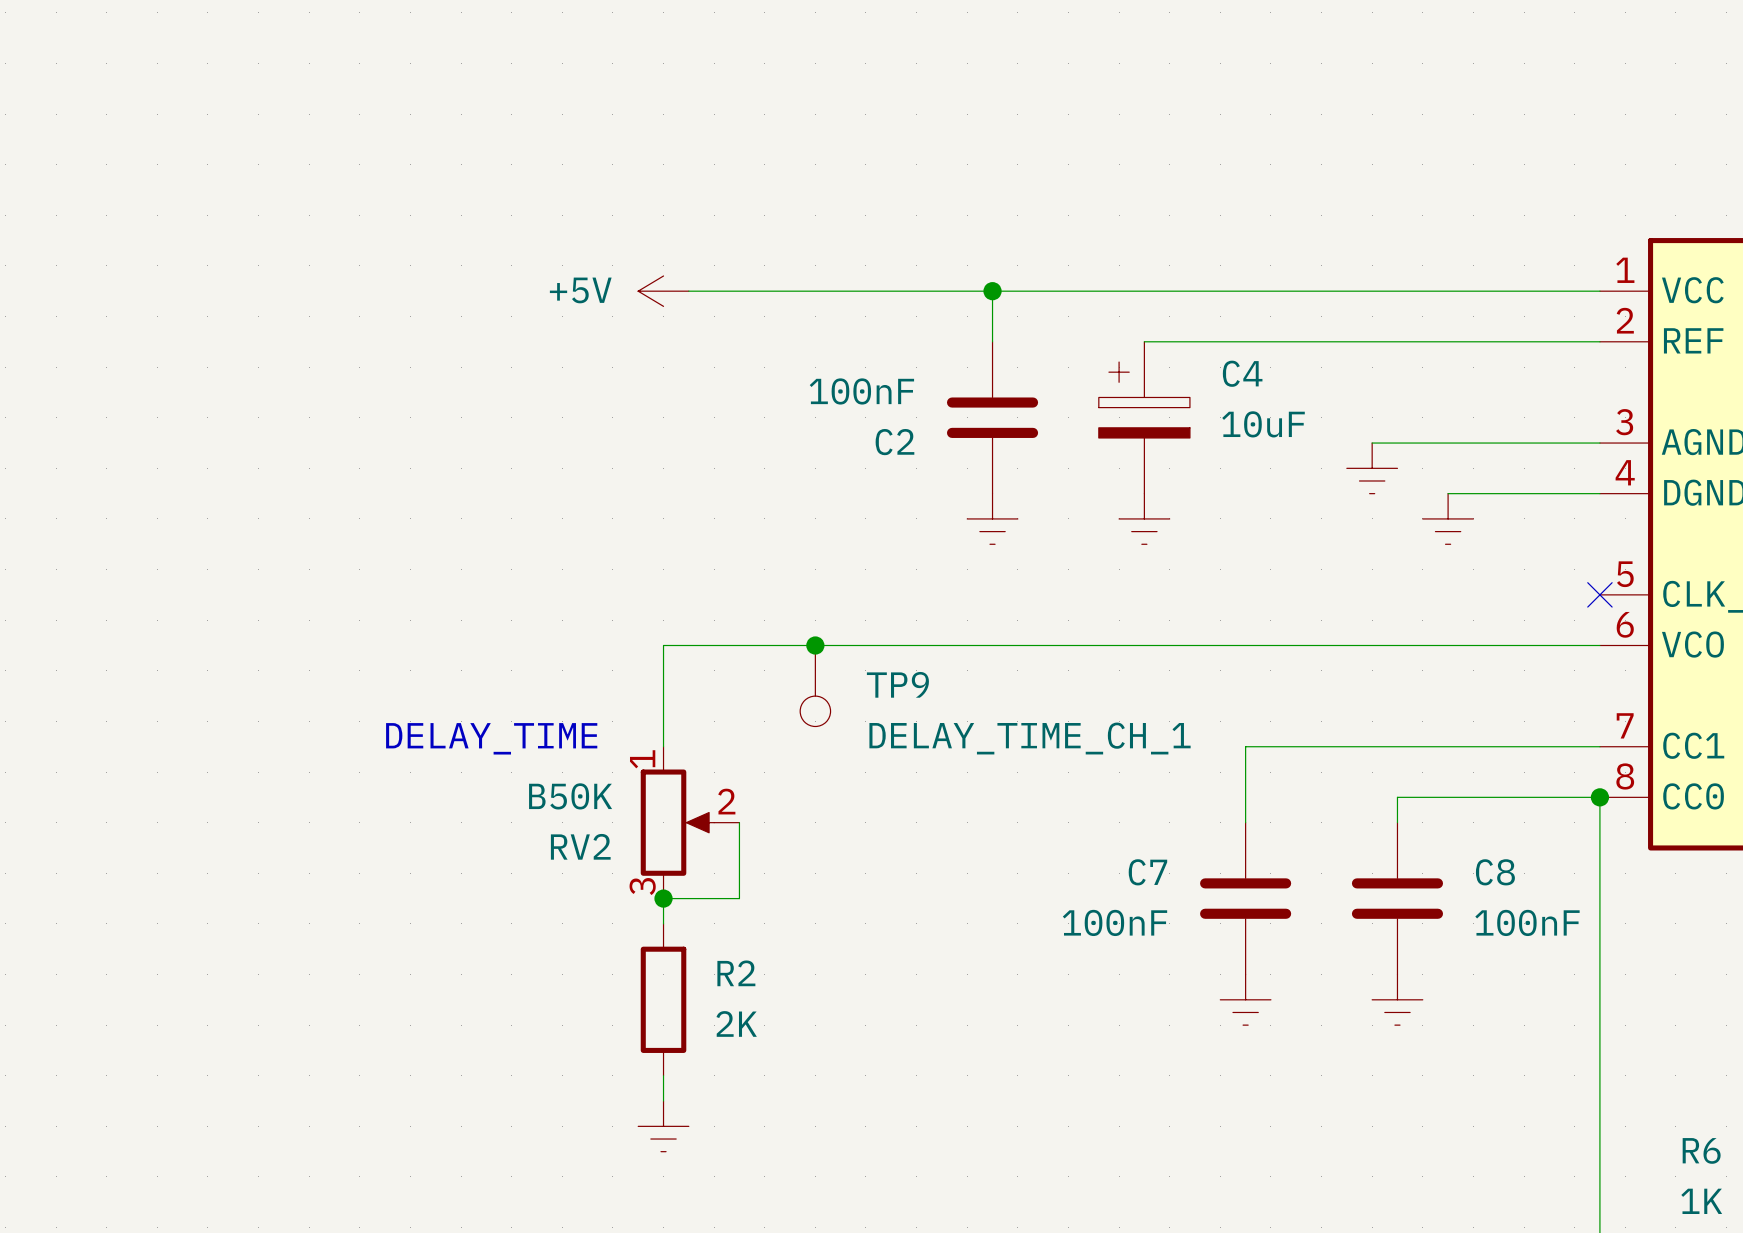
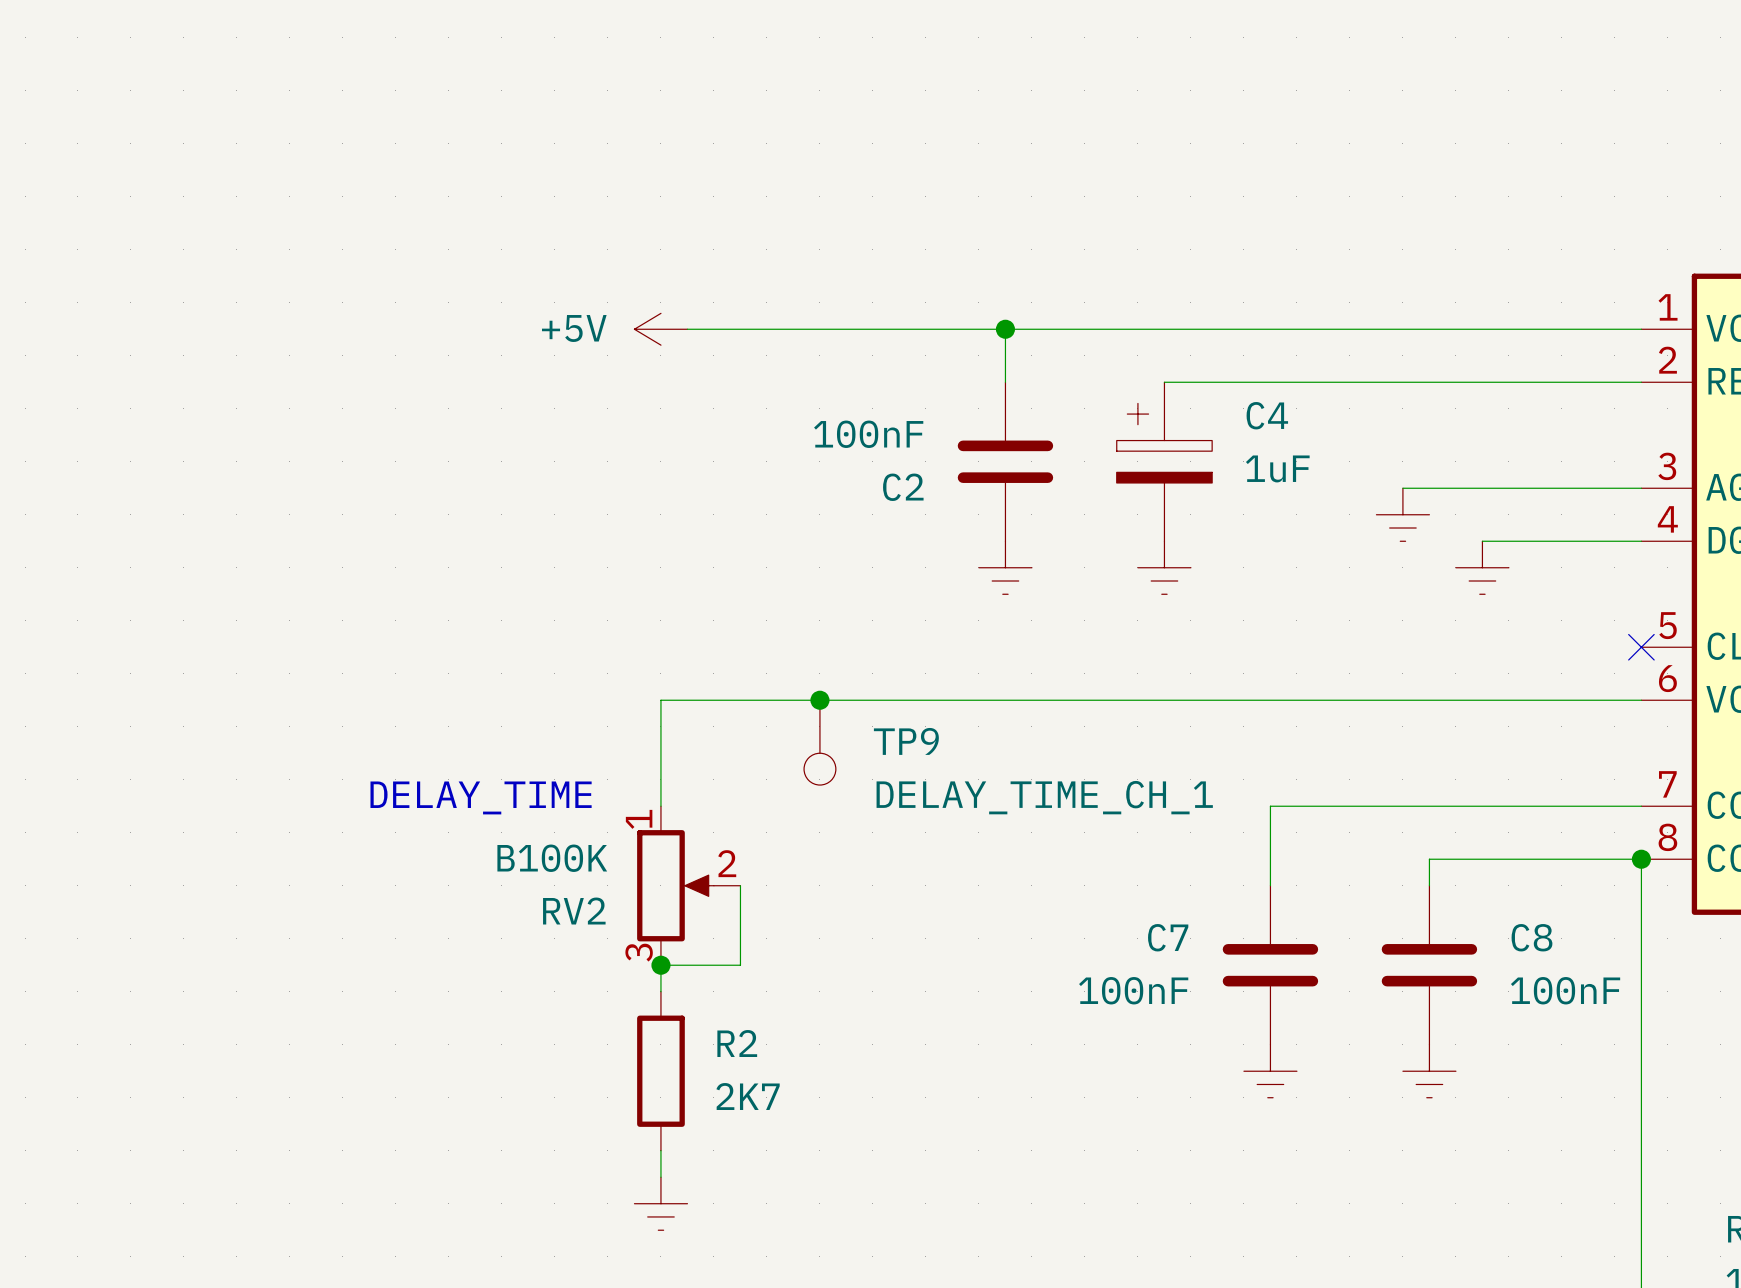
C4 value: 10uF (1263, 424) -> 1uF (1277, 468)
RV2 value: B50K (570, 796) -> B100K (552, 858)
R2 value: 2K (736, 1023) -> 2K7 (748, 1096)

